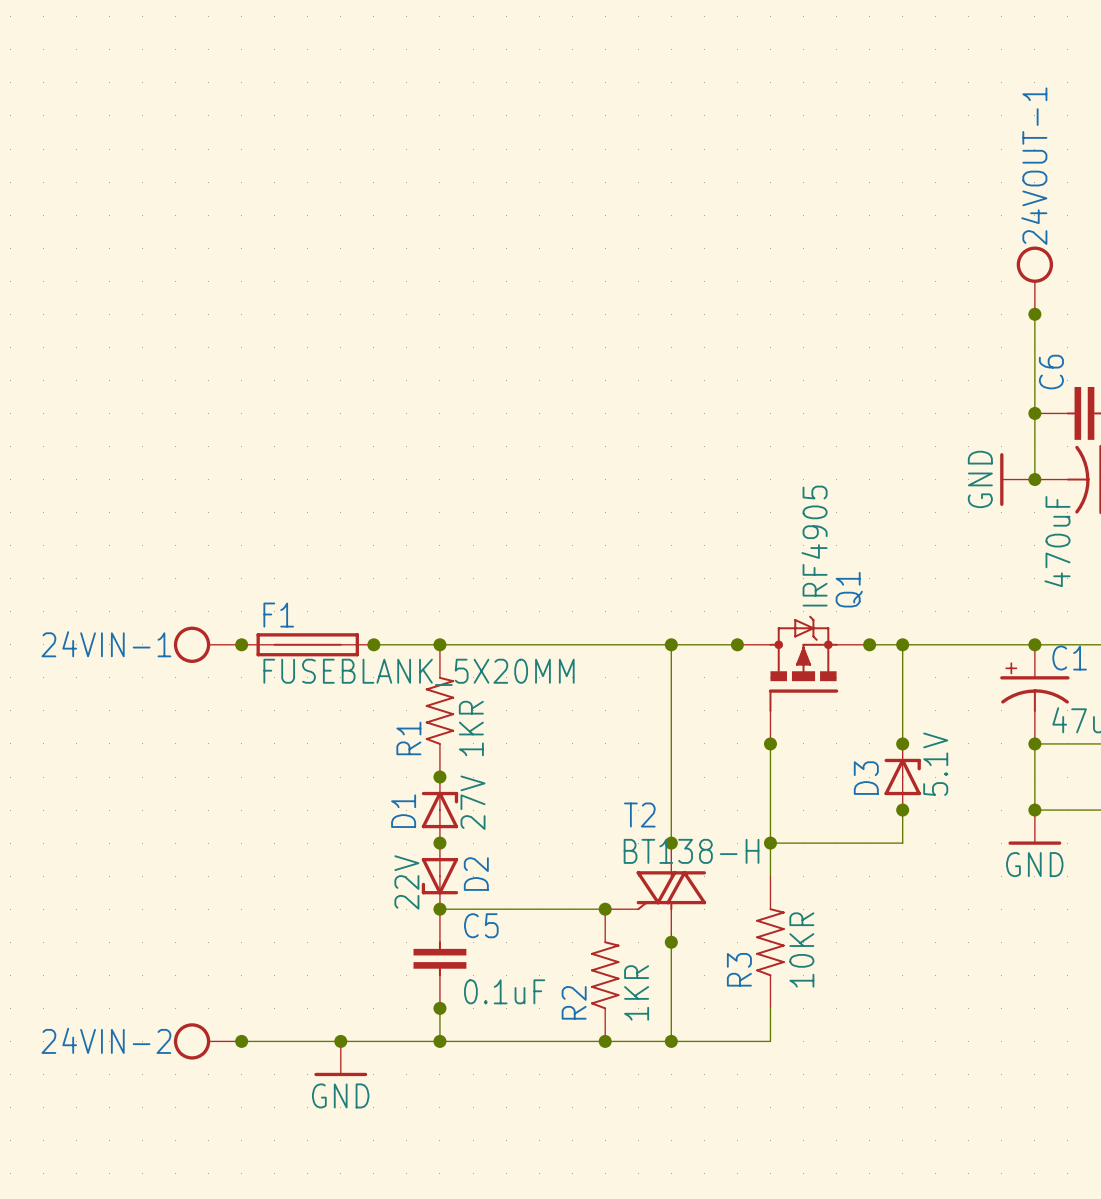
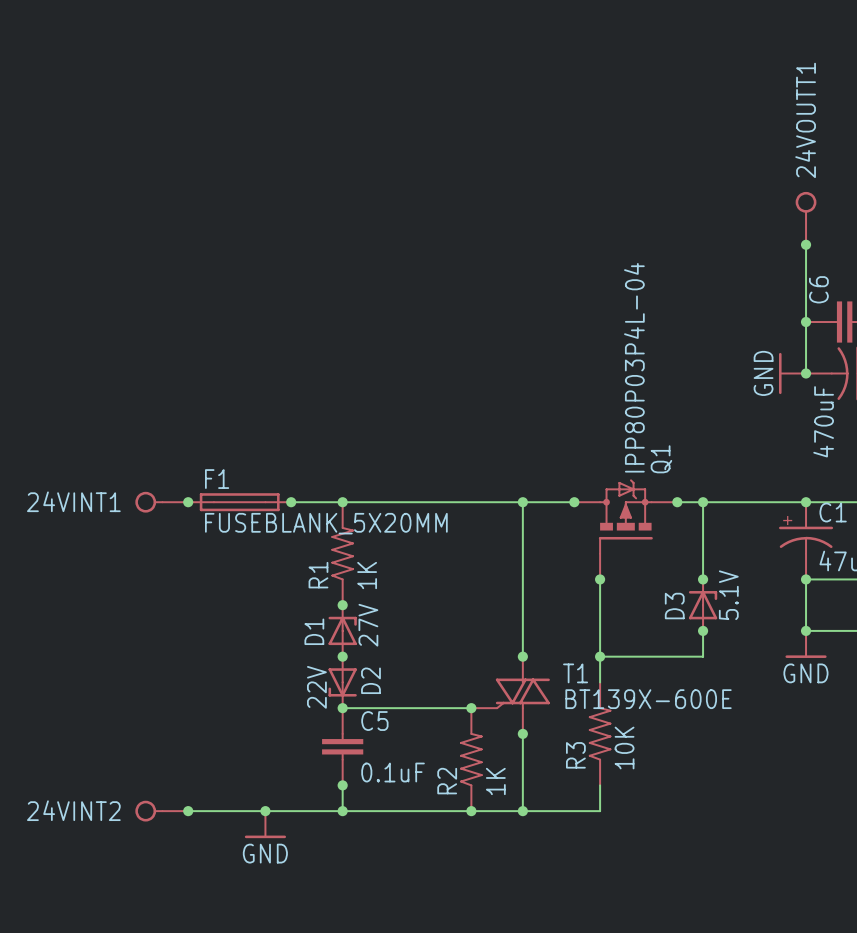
24VOUT-1: (1034, 280) -> none
24VOUTT1: none -> (806, 218)
Q1 value: IRF4905 (814, 546) -> IPP80P03P4L-04 (634, 367)
24VIN-1: (207, 644) -> none
24VINT1: none -> (161, 502)
R1 value: 1KR (471, 728) -> 1K (367, 575)
T2 name: T2 (639, 815) -> T1 (575, 673)
T2 value: BT138-H (691, 851) -> BT139X-600E (648, 699)
R3 value: 10KR (801, 949) -> 10K (624, 748)
R2 value: 1KR (636, 992) -> 1K (495, 781)
24VIN-2: (207, 1041) -> none
24VINT2: none -> (161, 811)

